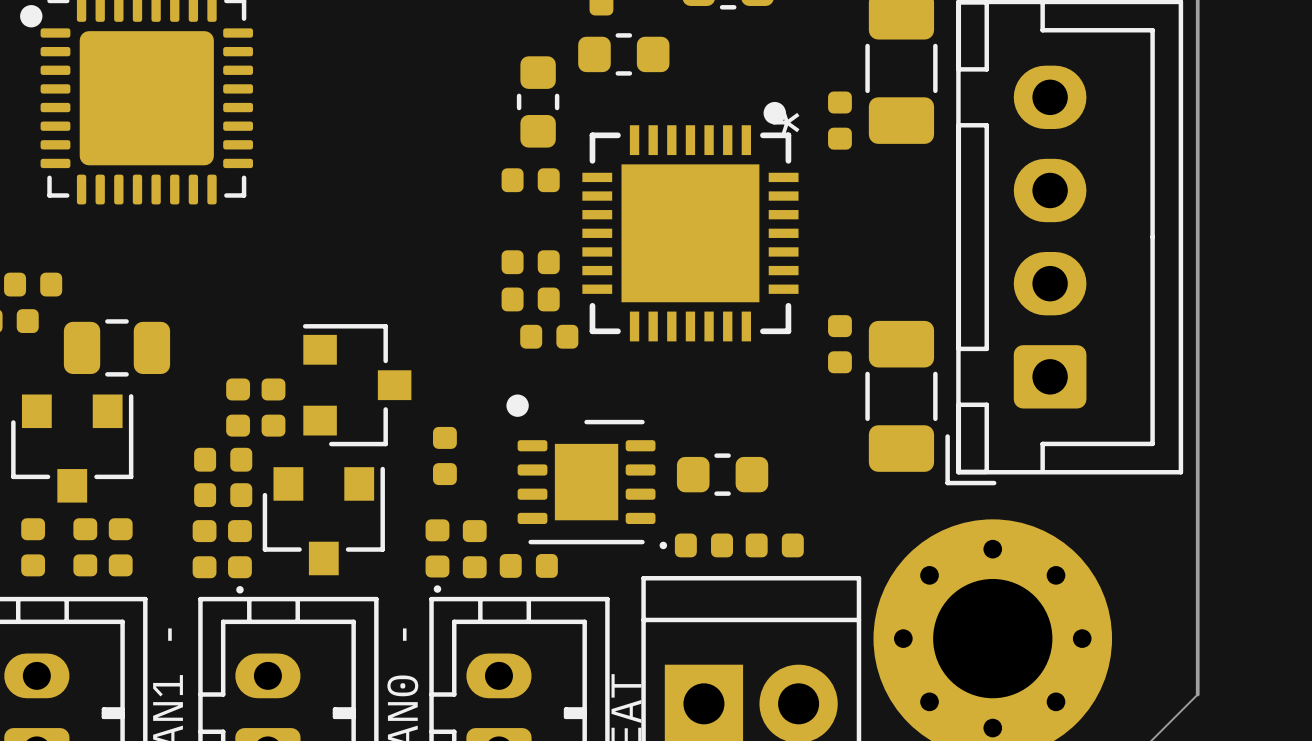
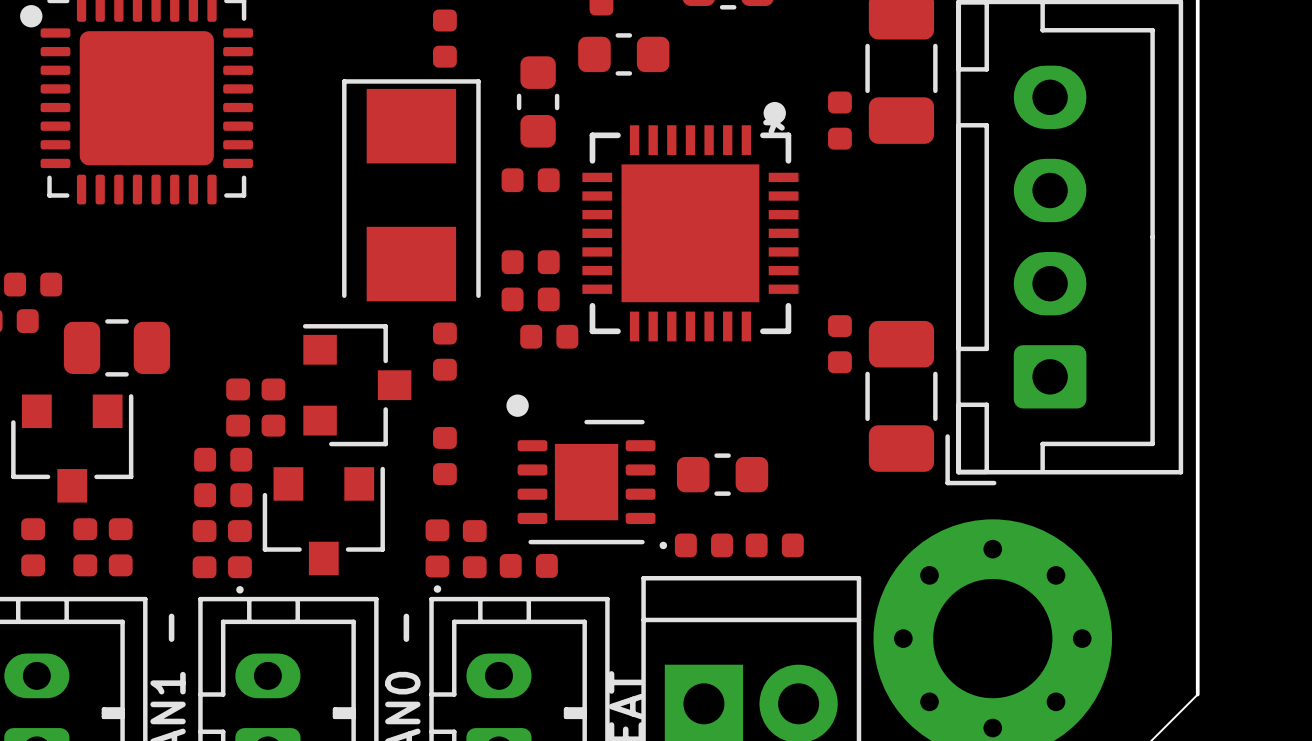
part: none -> (444, 38)
part: none -> (411, 190)
part: none -> (444, 351)

